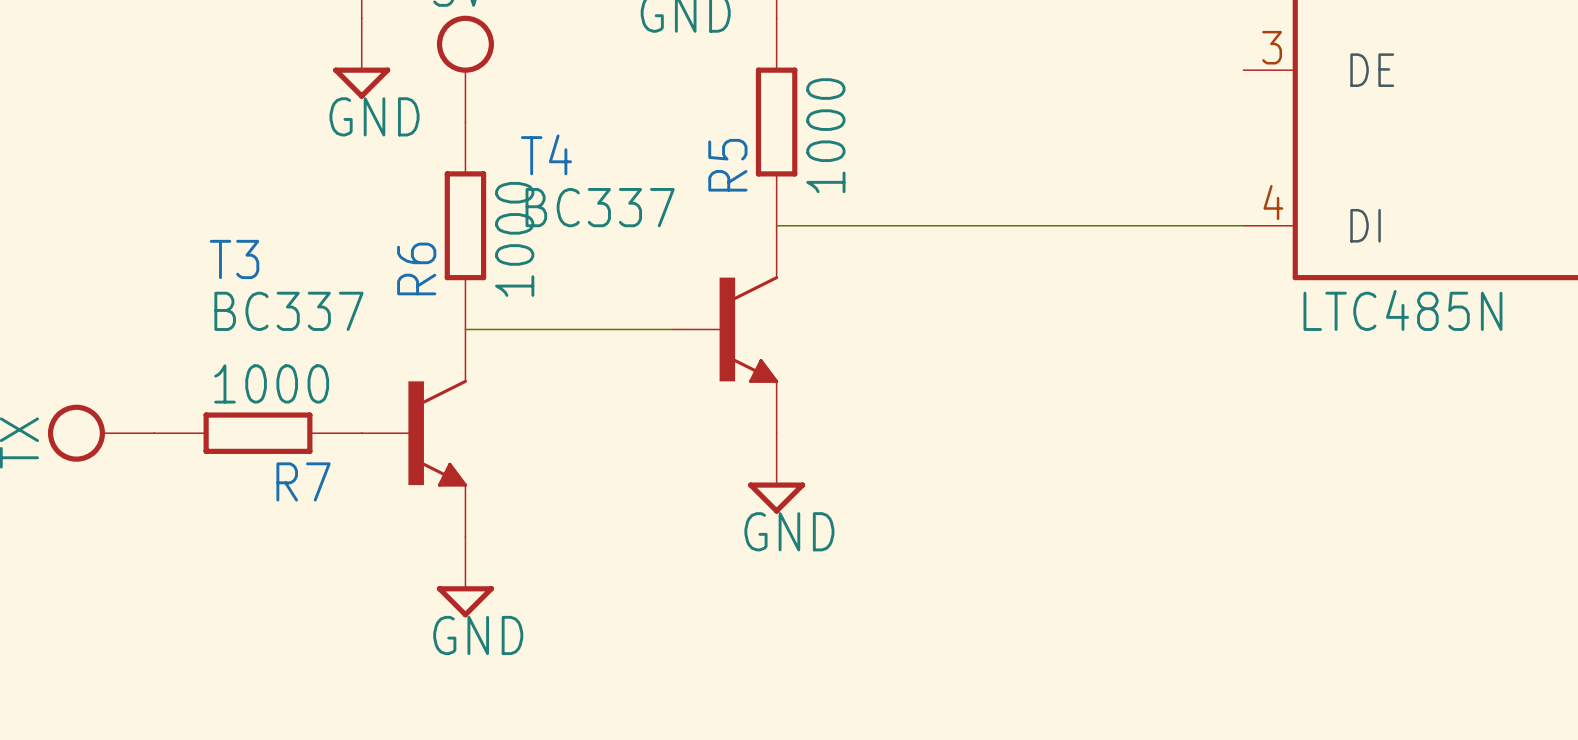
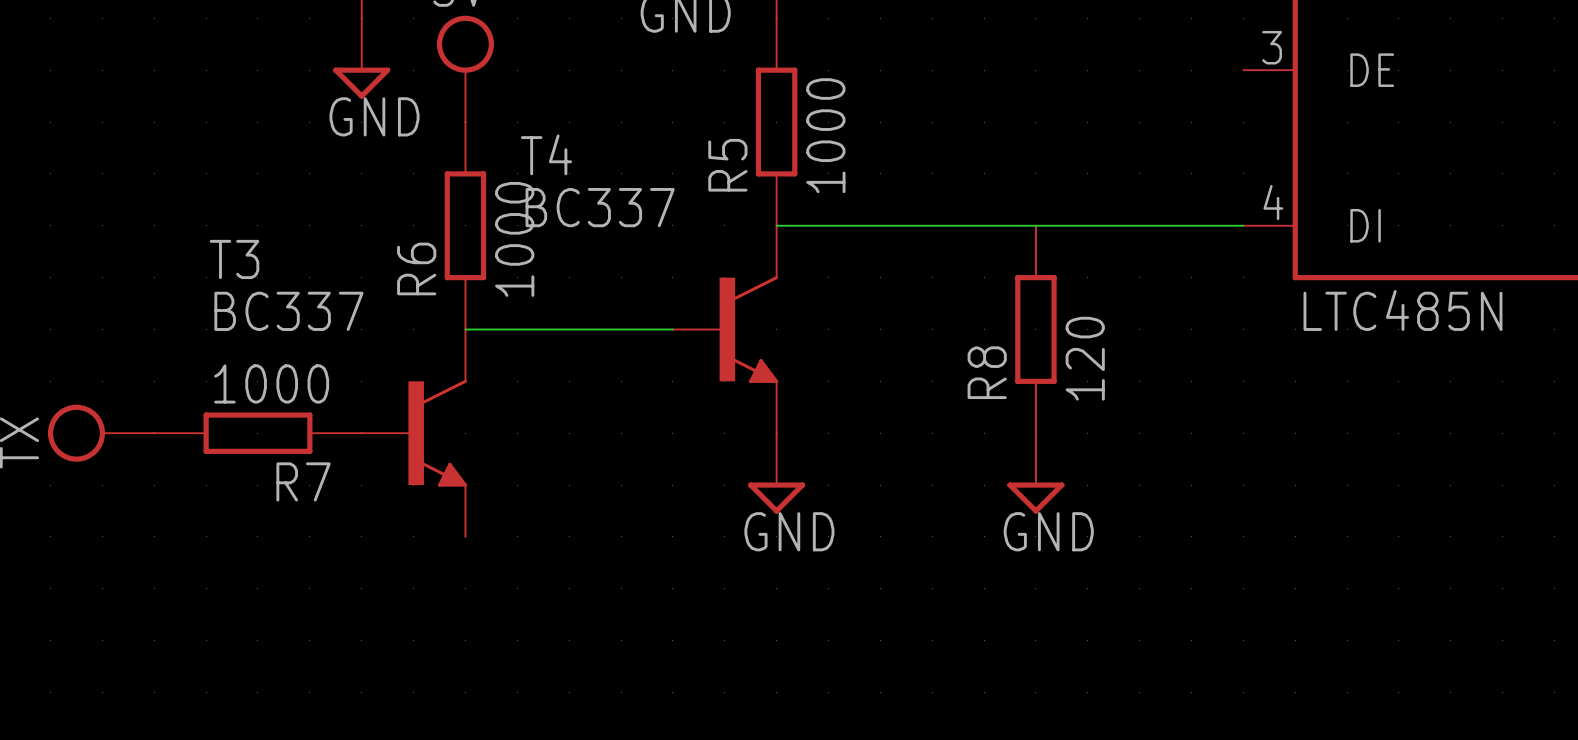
R8: none -> 120 (1035, 329)
power symbol: none -> GND (1035, 473)
power symbol: GND (465, 577) -> none

